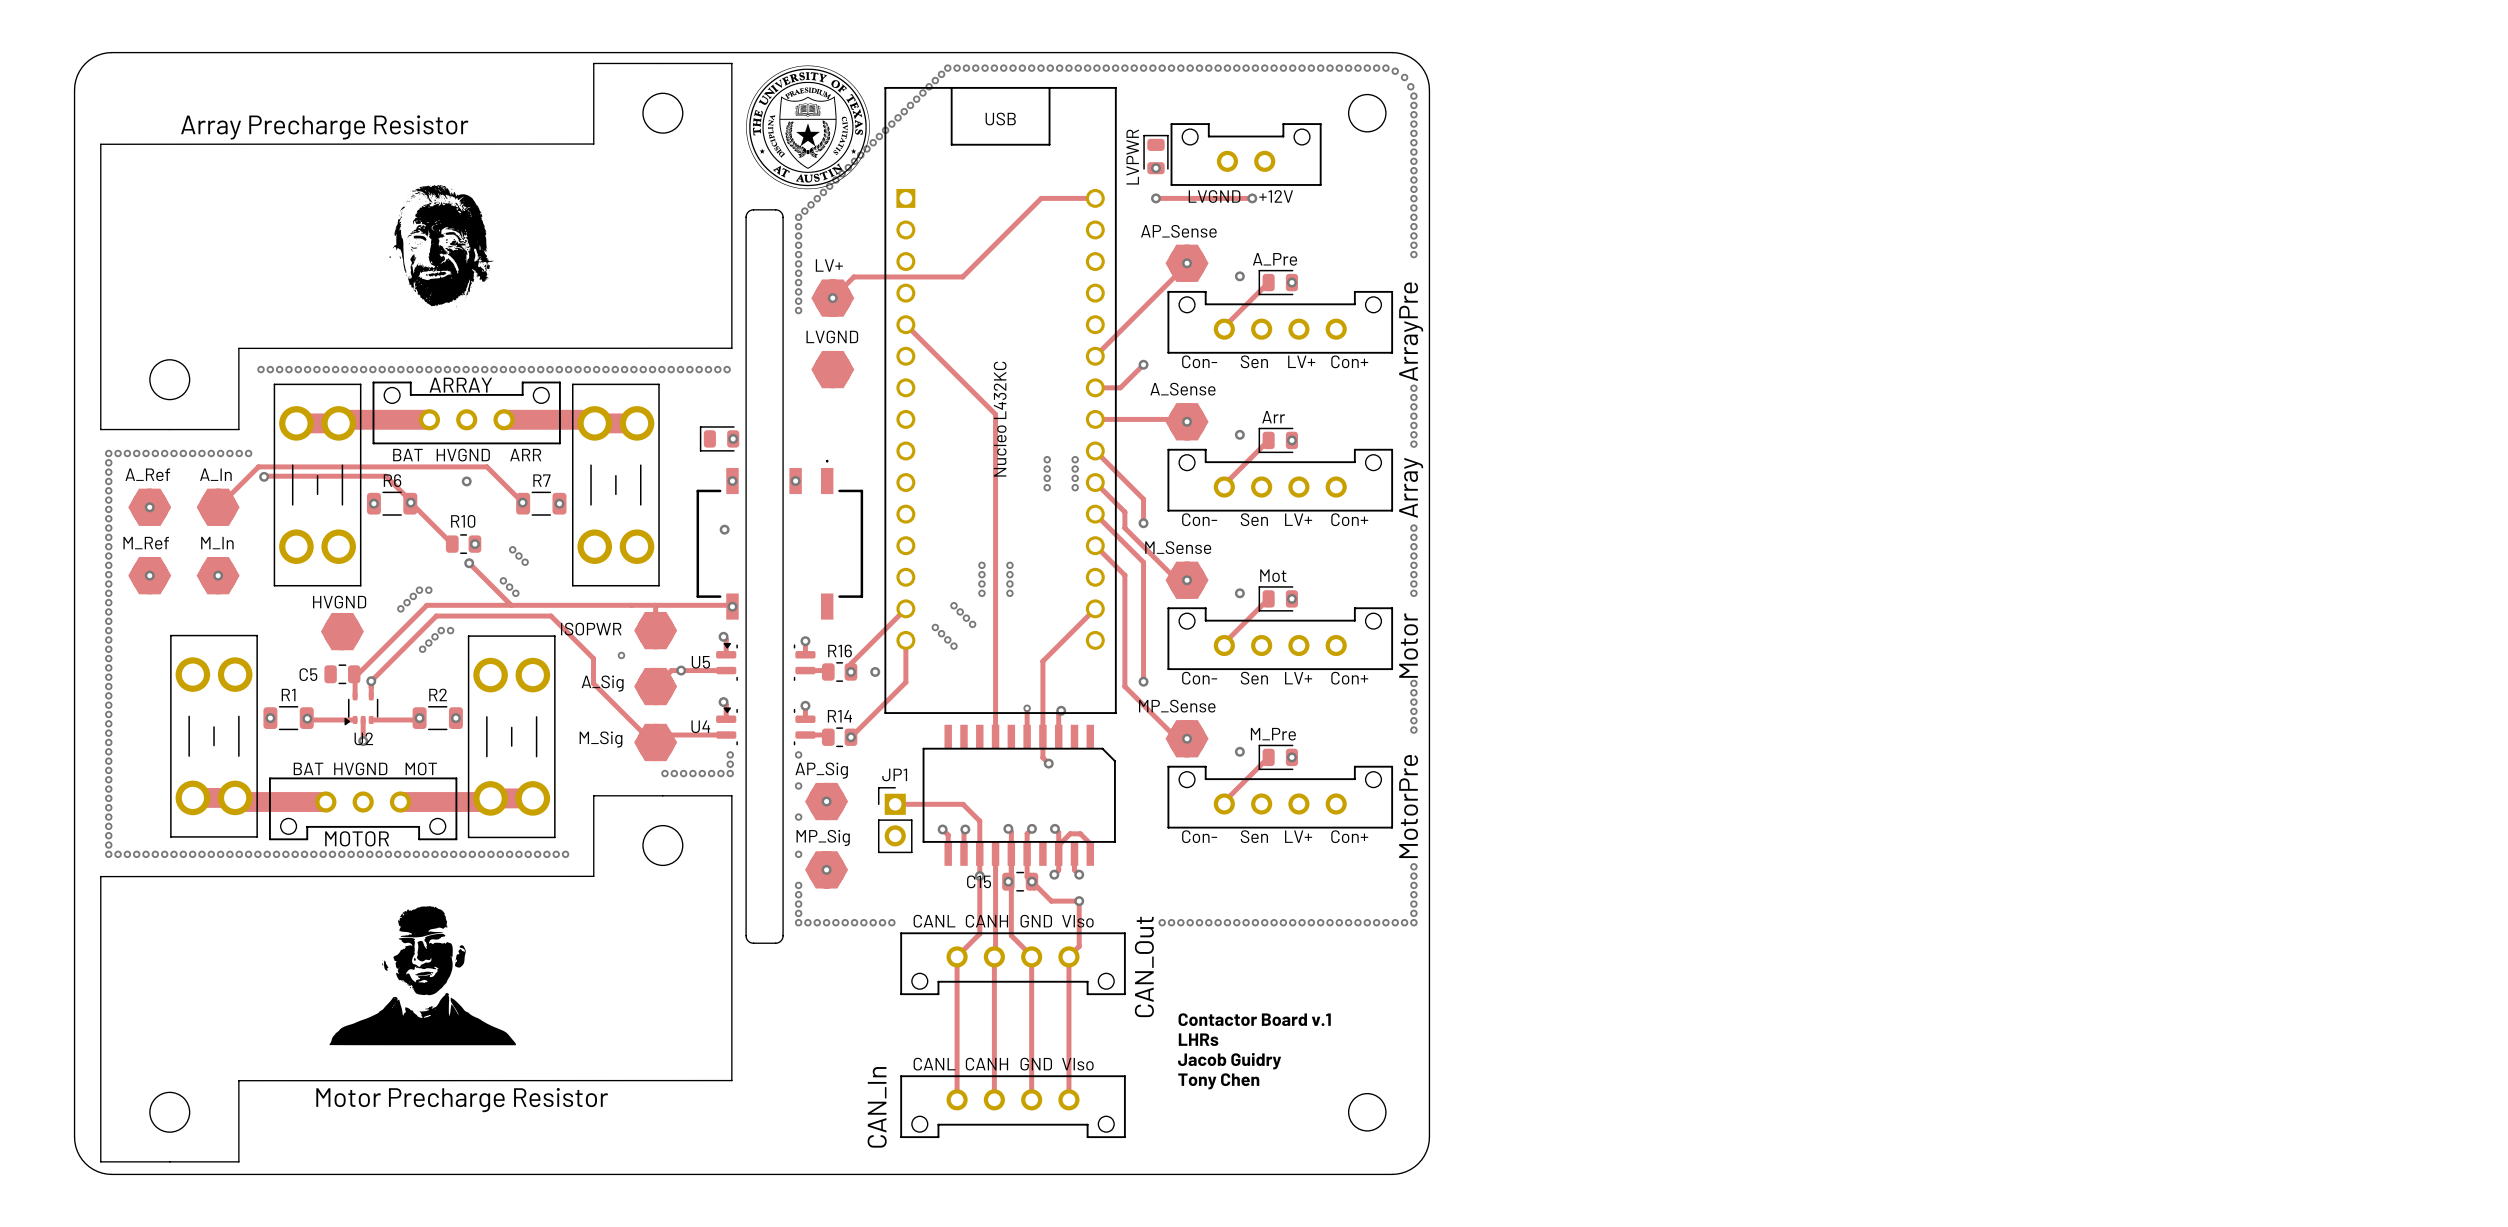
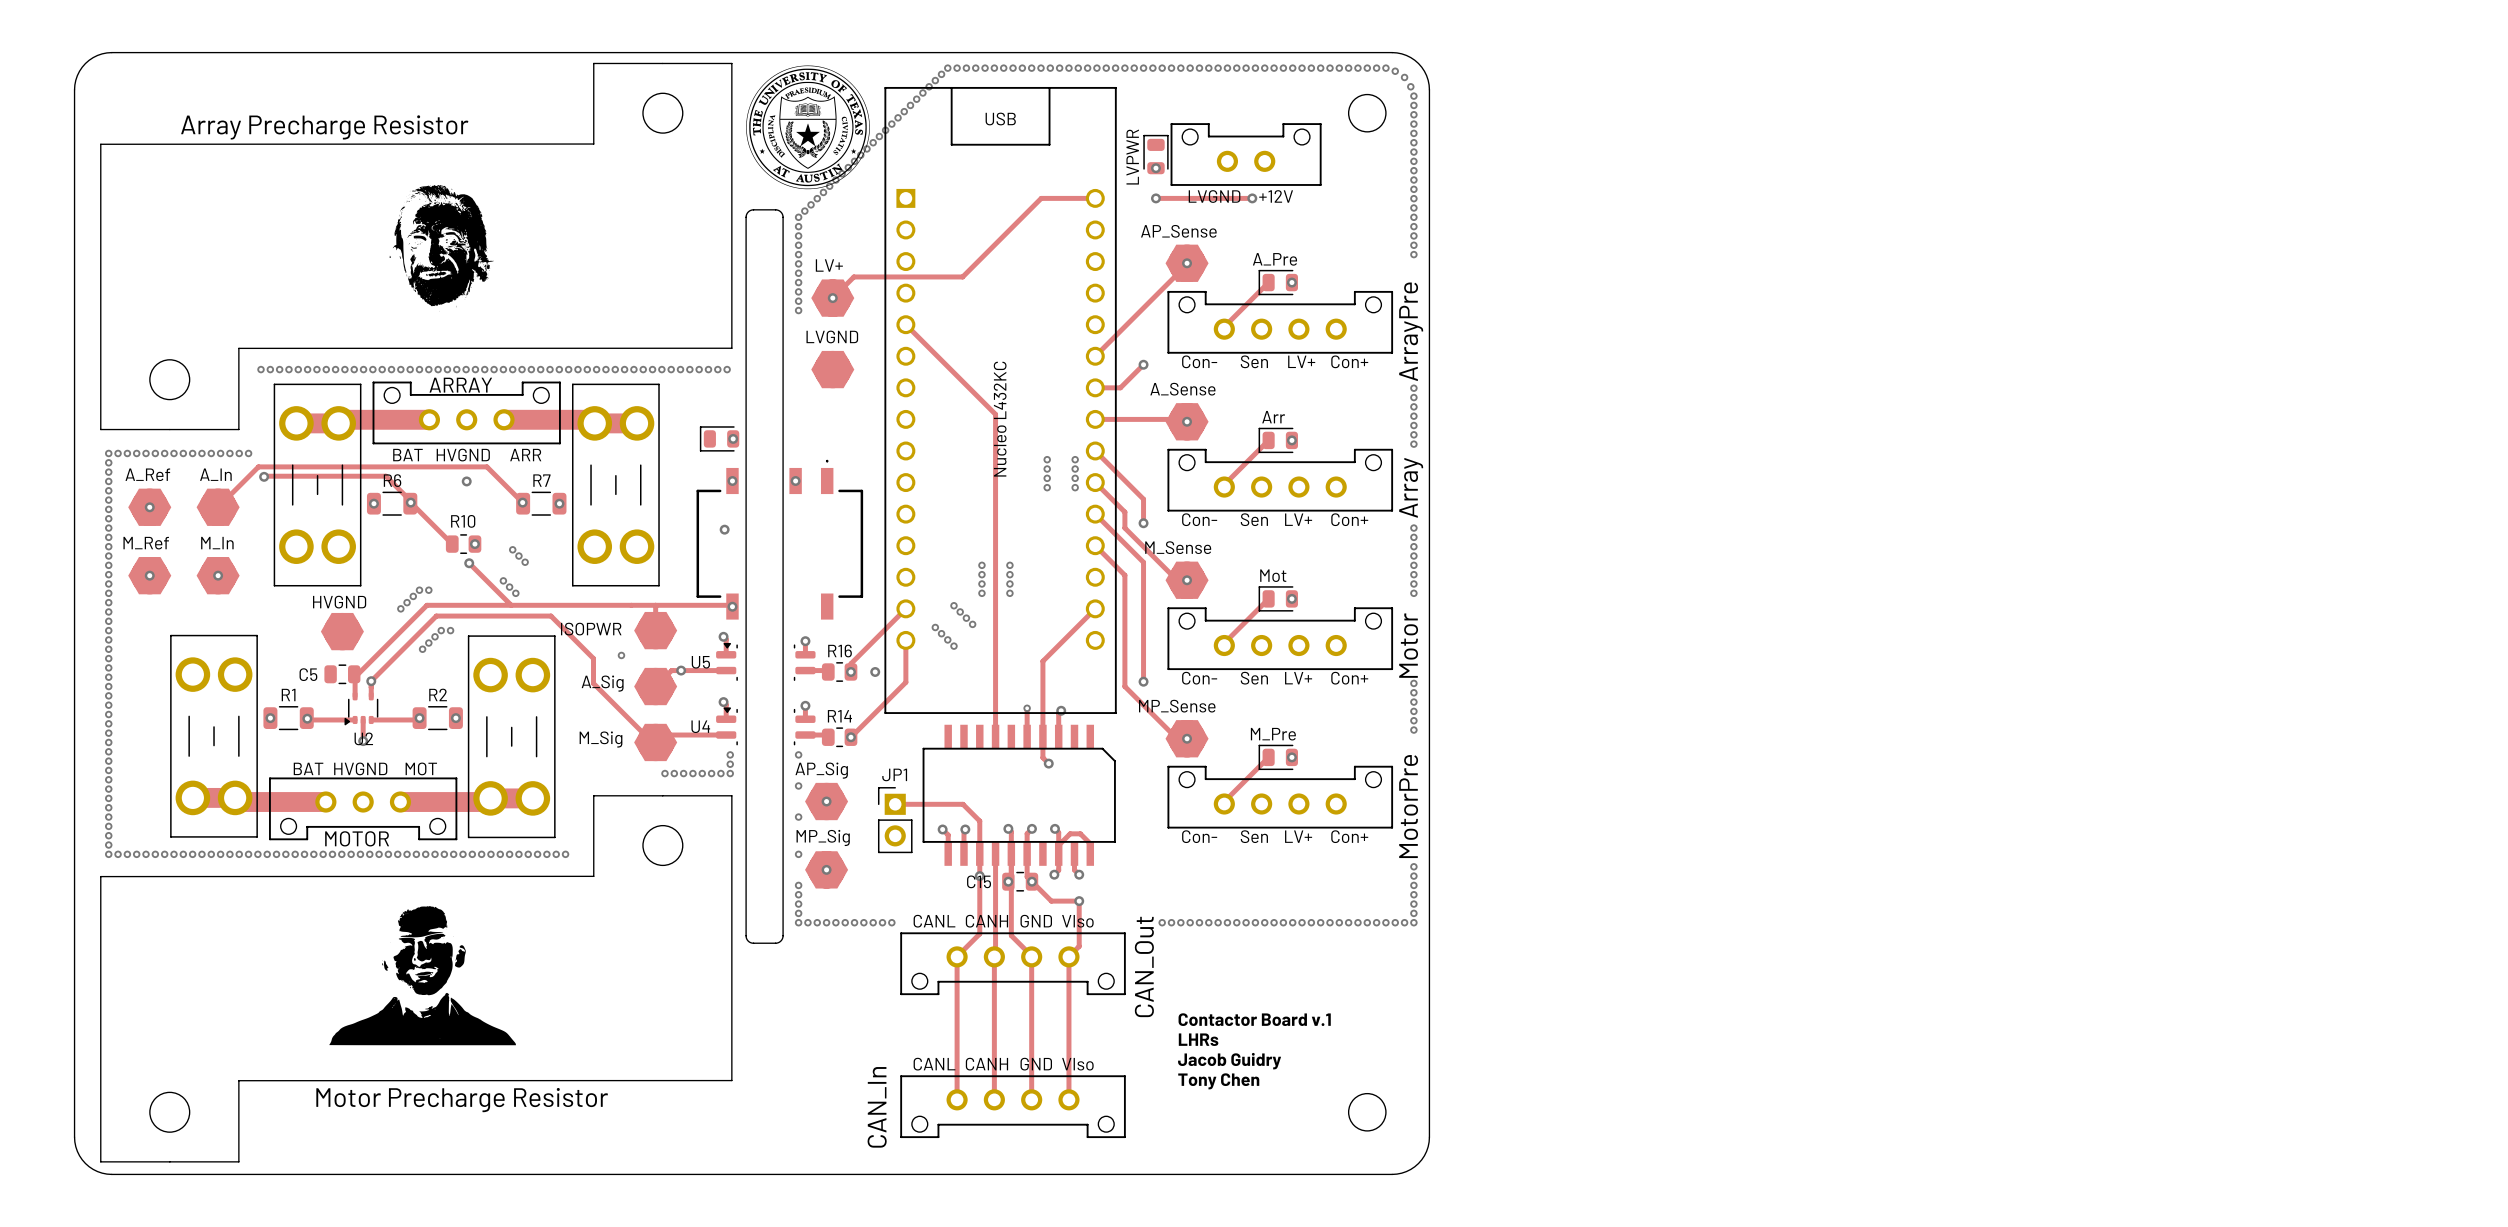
via: (1239, 276) -> none
via: (1239, 434) -> none
via: (1239, 593) -> none
via: (1239, 751) -> none

